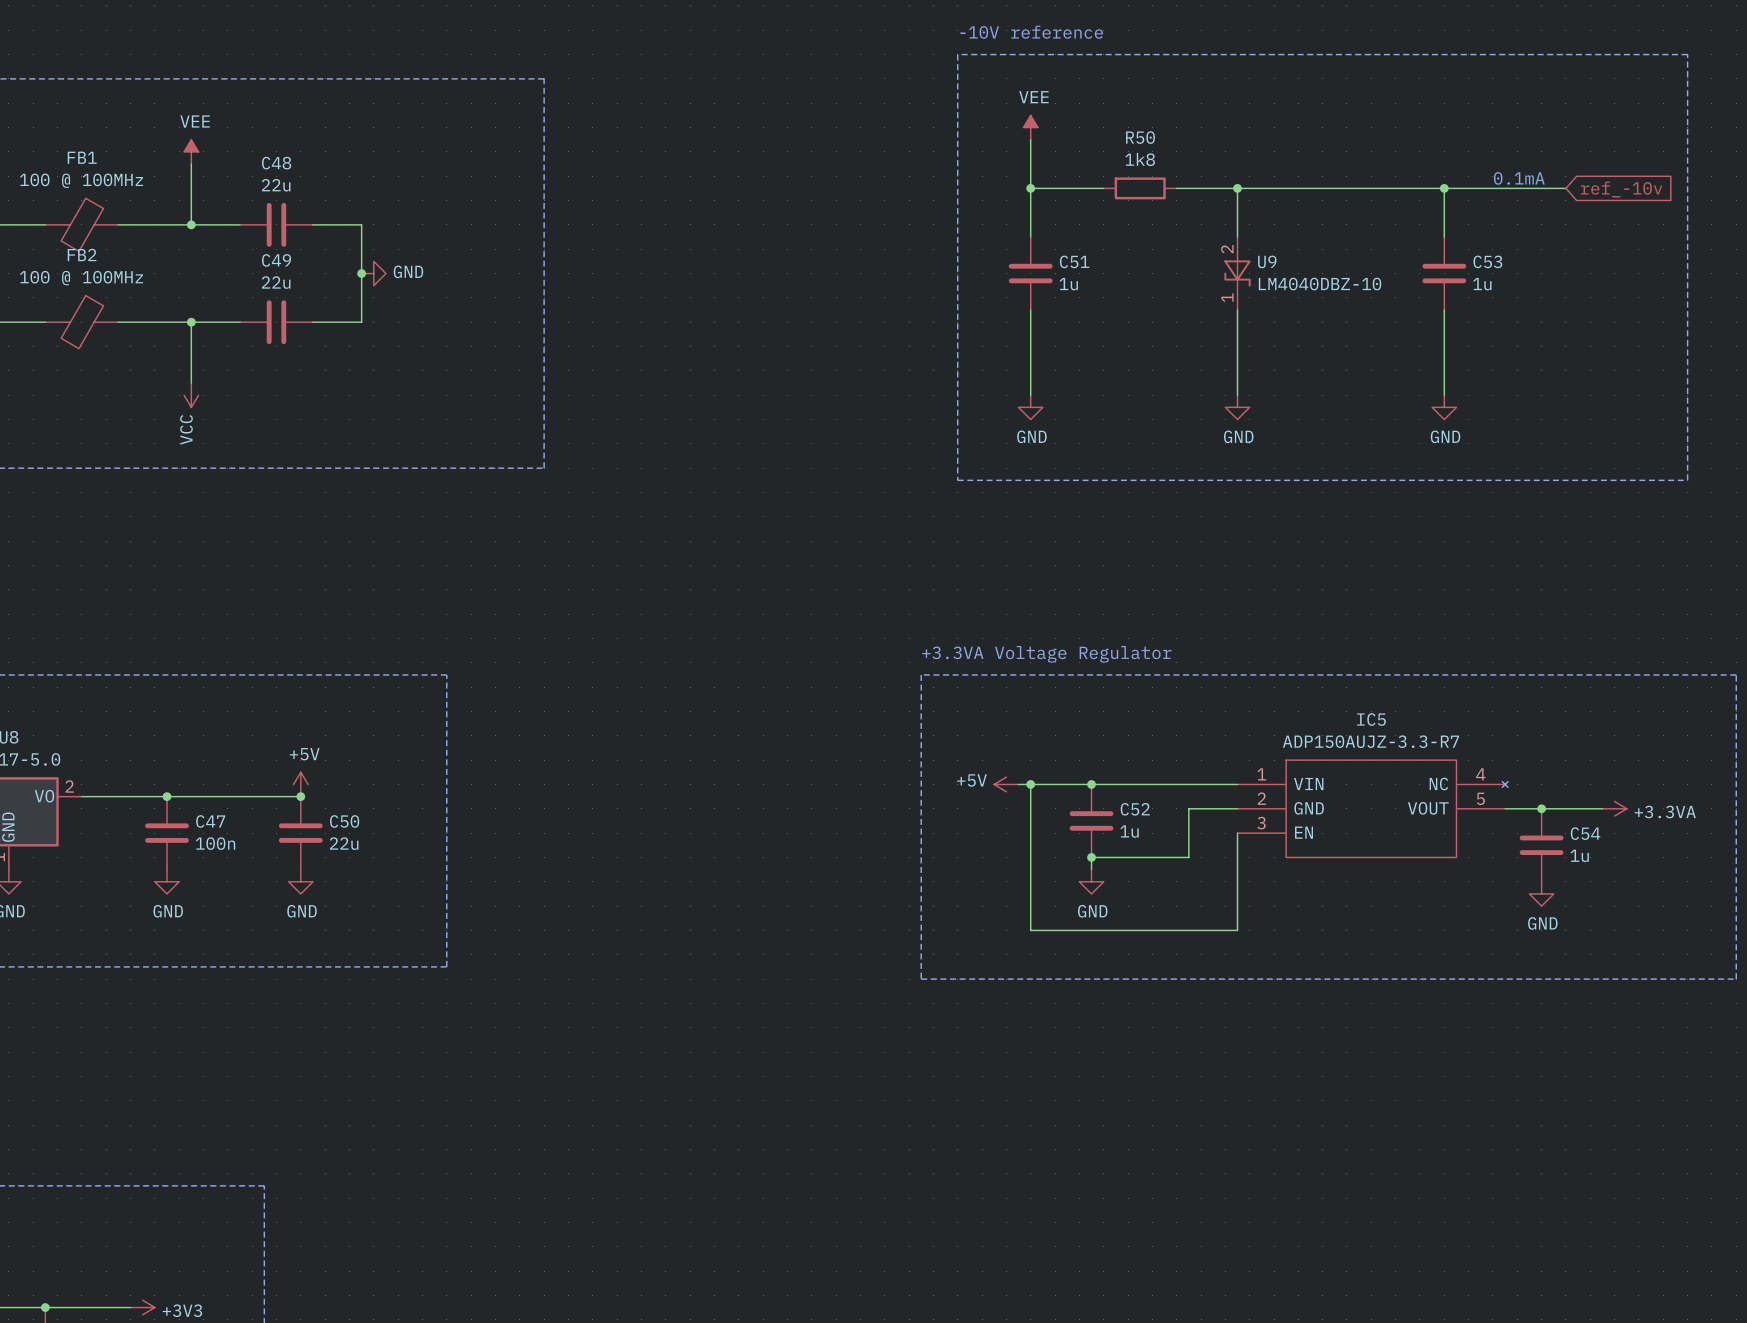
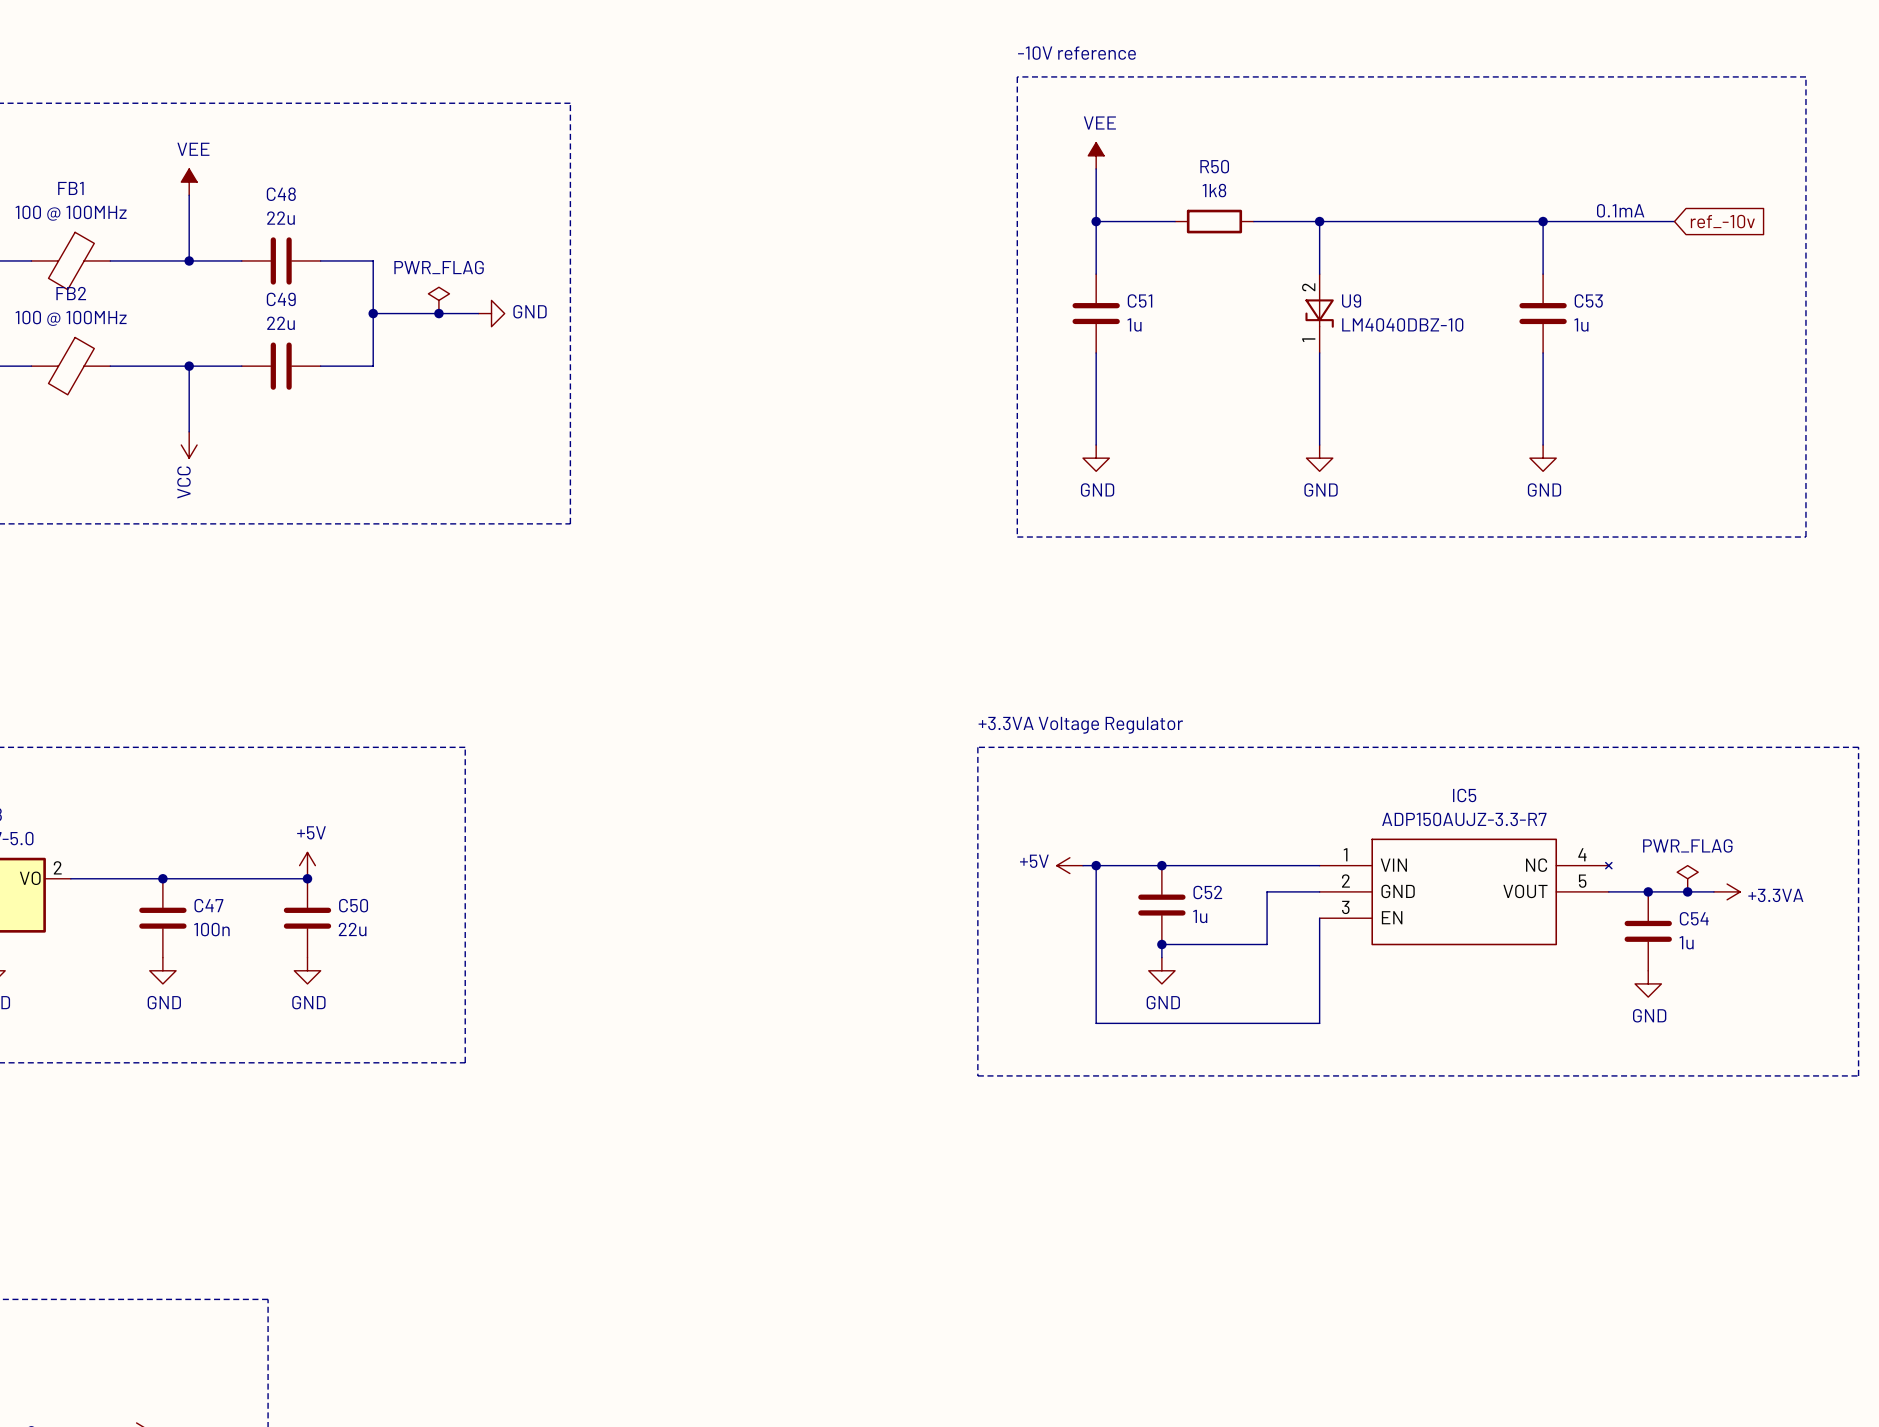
power symbol: none -> PWR_FLAG (438, 300)
wire: none -> (373, 313) (478, 313)
power symbol position: GND (373, 273) -> GND (491, 313)
junction: none -> (438, 313)
power symbol: none -> PWR_FLAG (1687, 878)
junction: none -> (1687, 891)

